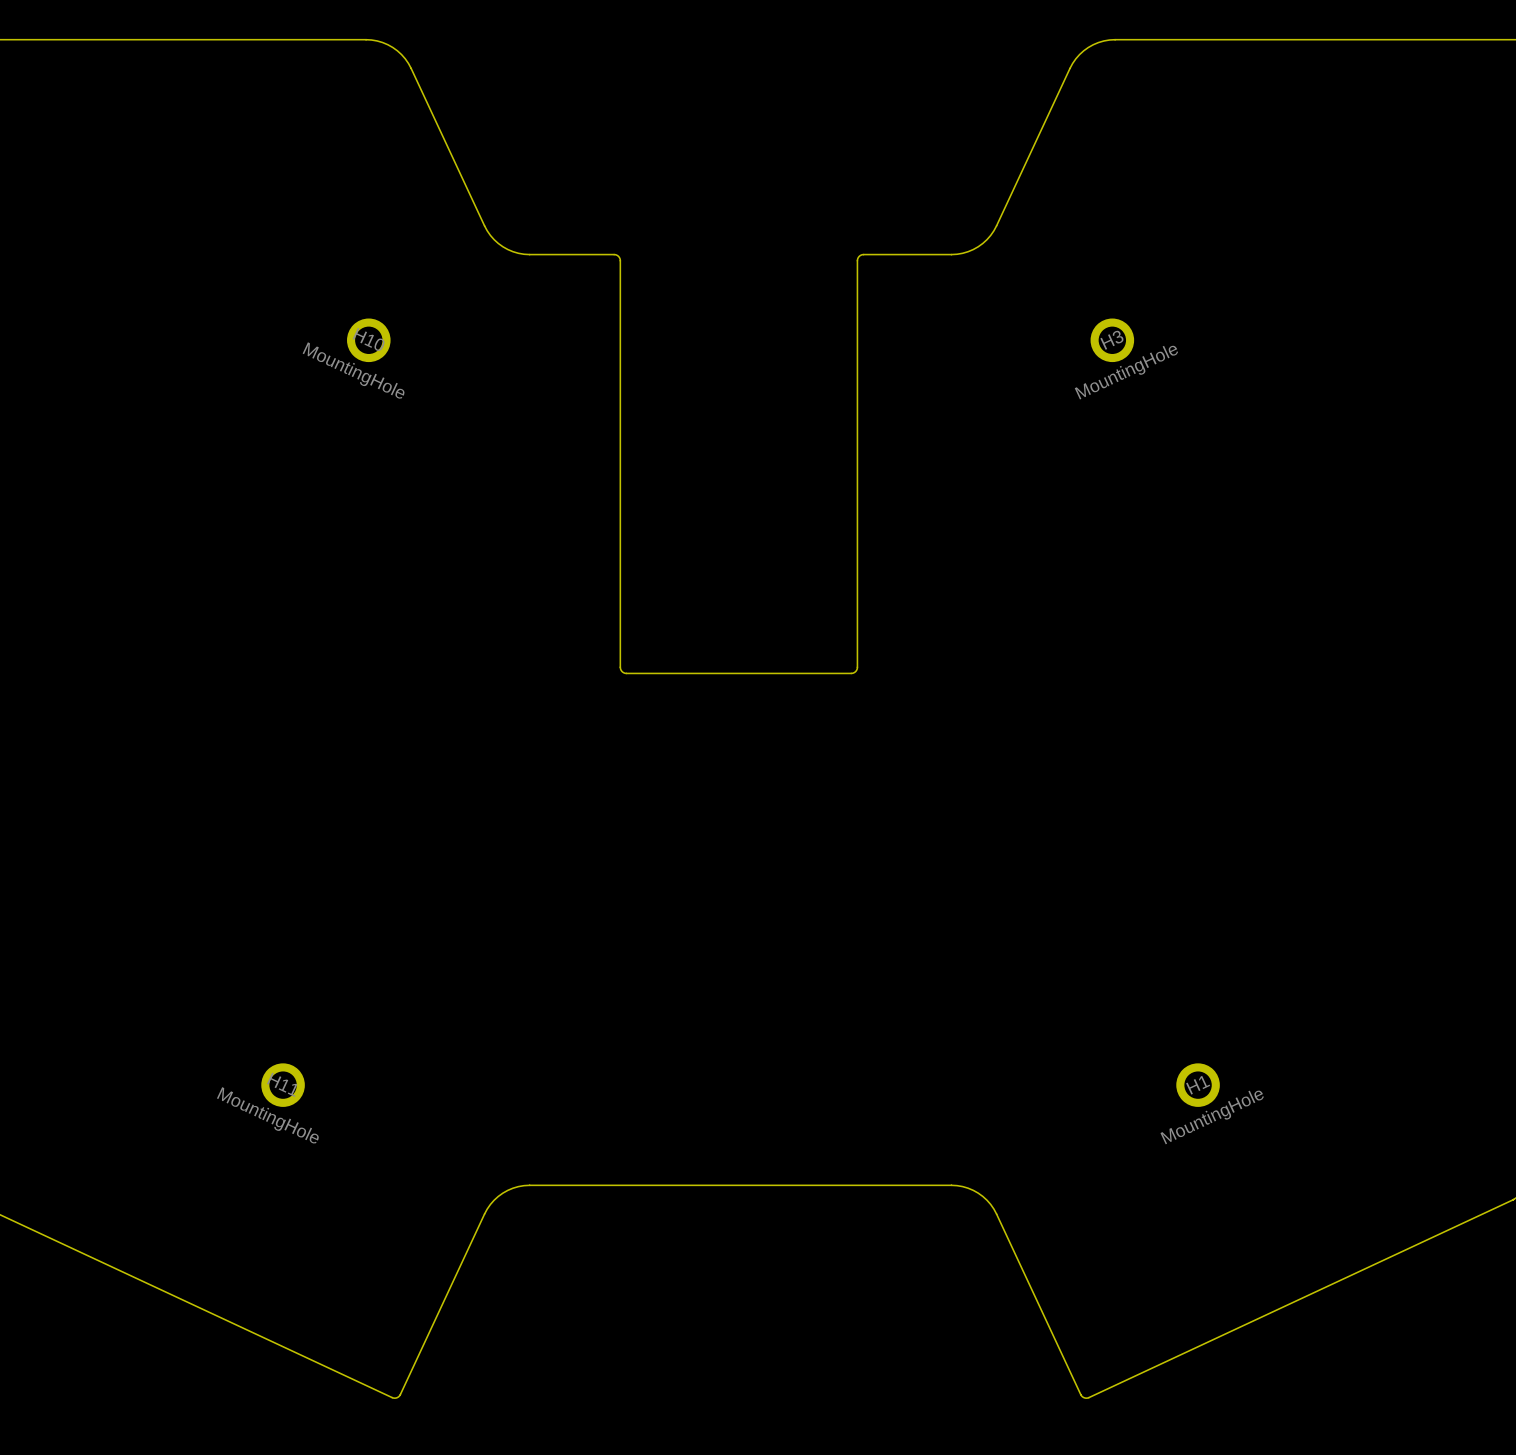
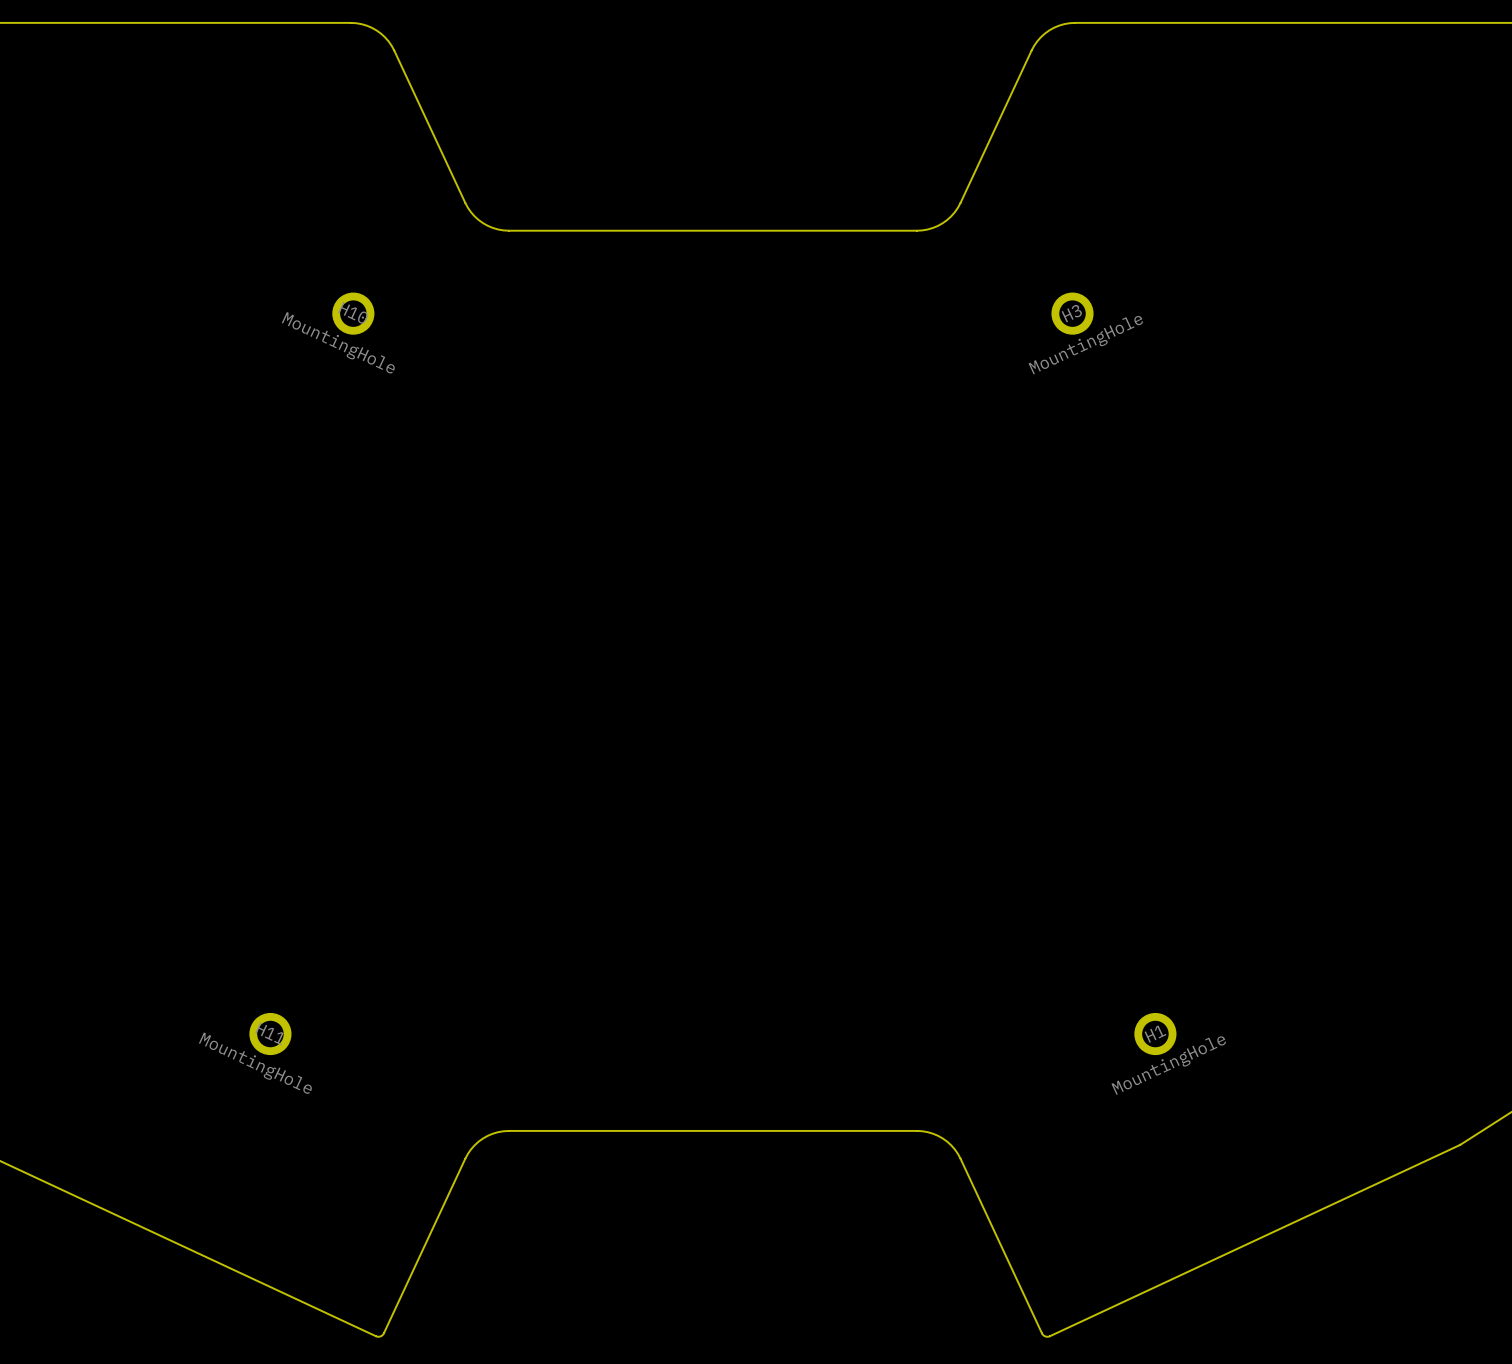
board edge: (614, 254) (618, 256) (620, 260) (620, 667) (622, 671) (626, 673) (851, 673) (856, 670) (857, 260) (859, 256) (863, 254) -> (590, 230) (831, 230)

